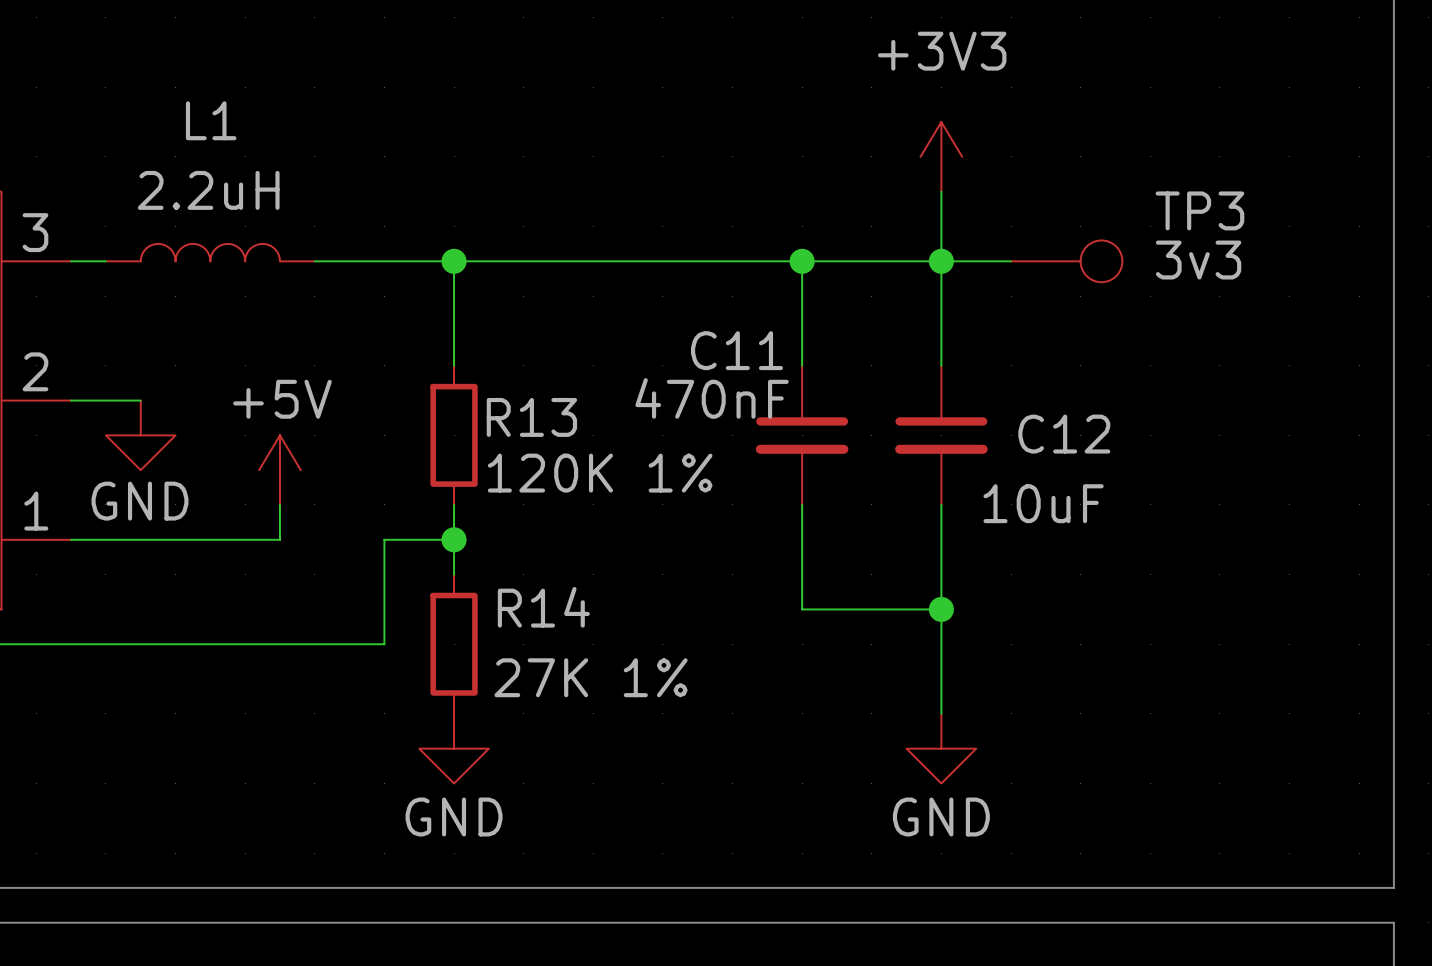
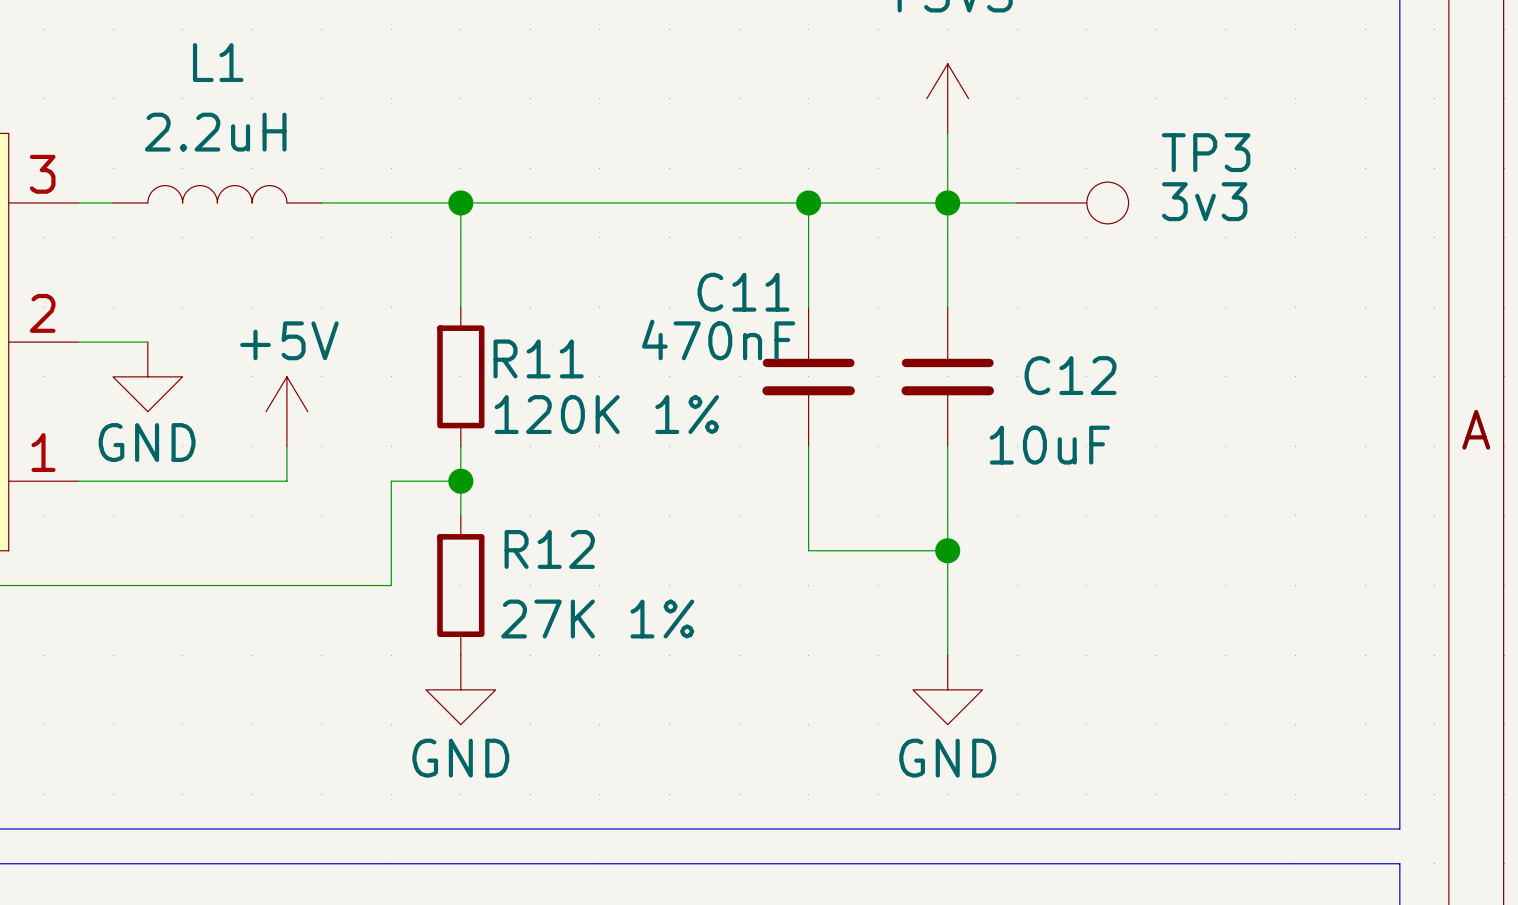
R13 name: R13 (531, 417) -> R11 (538, 358)
R14 name: R14 (543, 607) -> R12 (549, 549)

